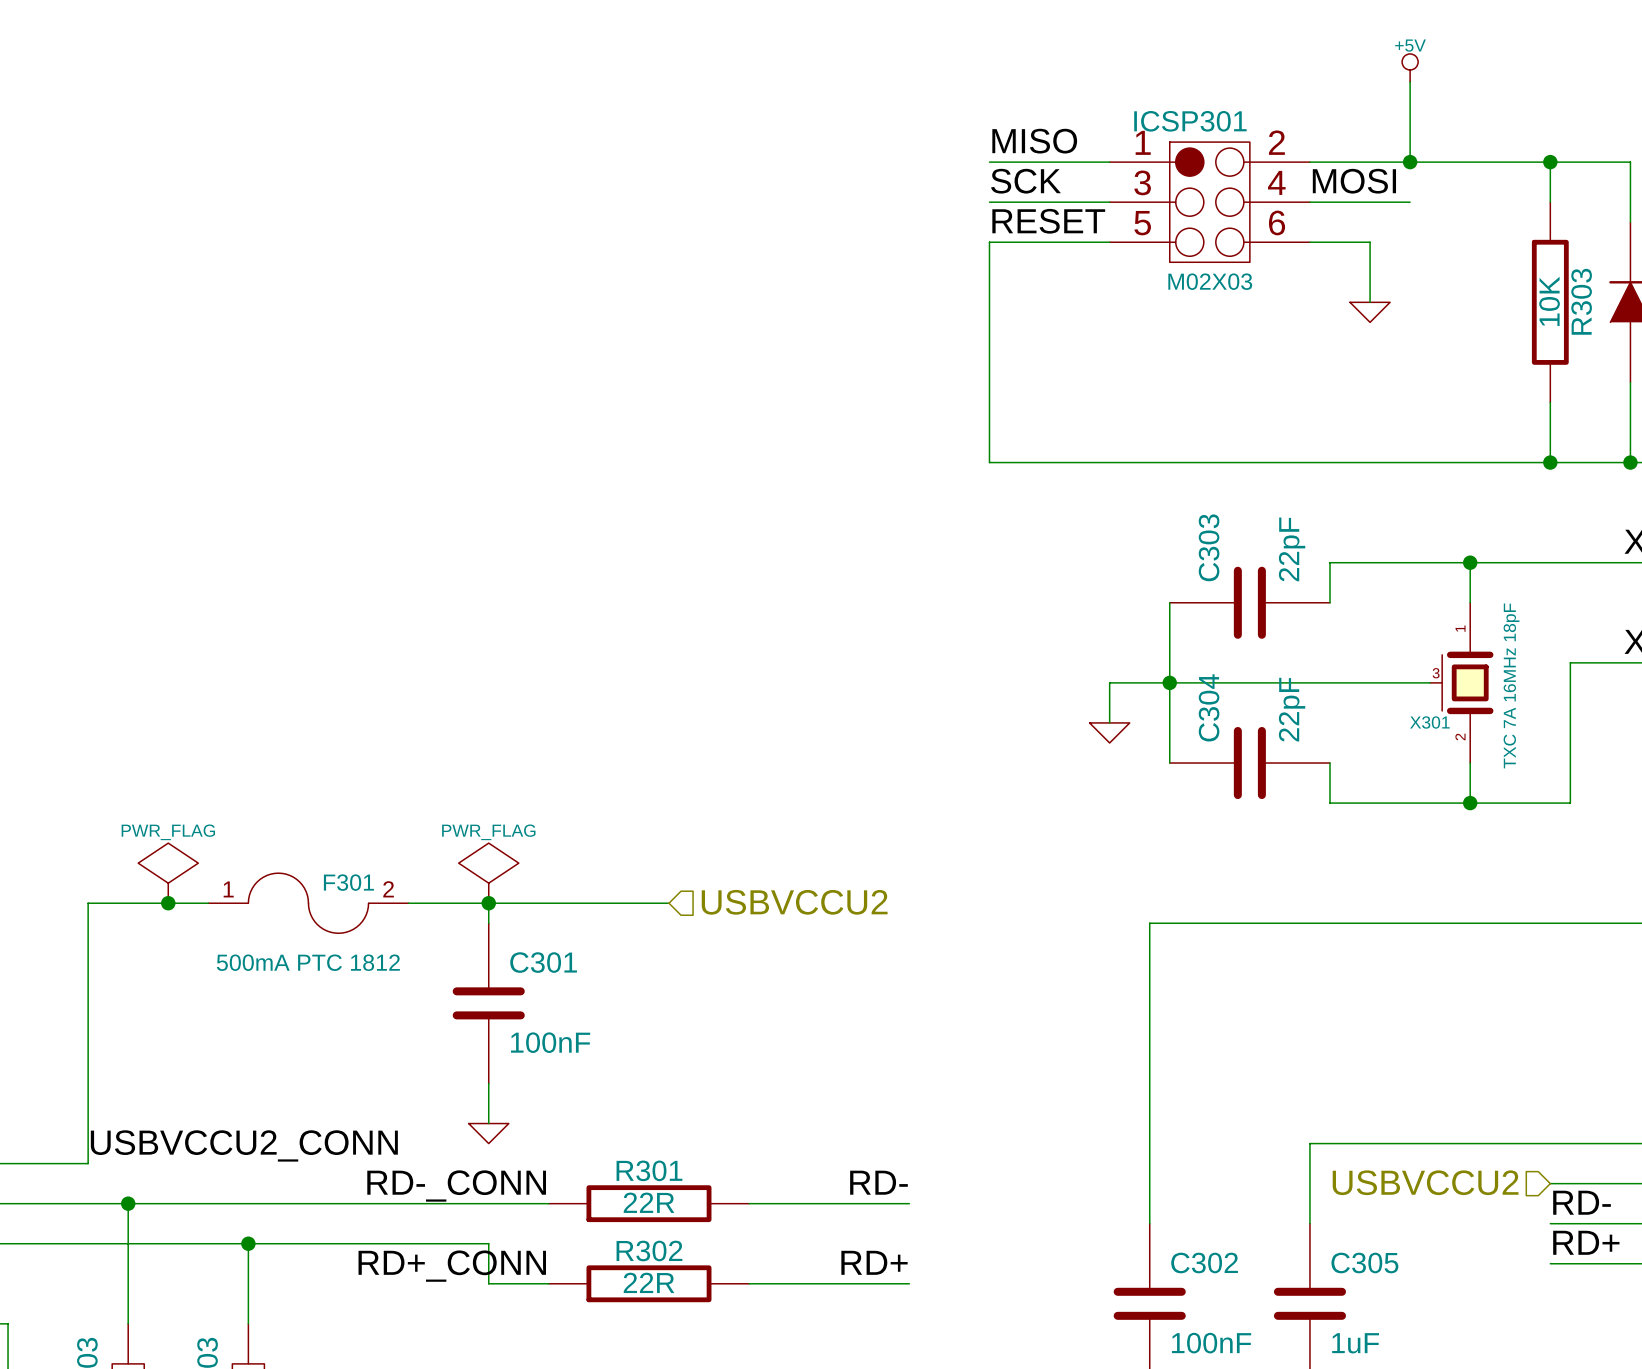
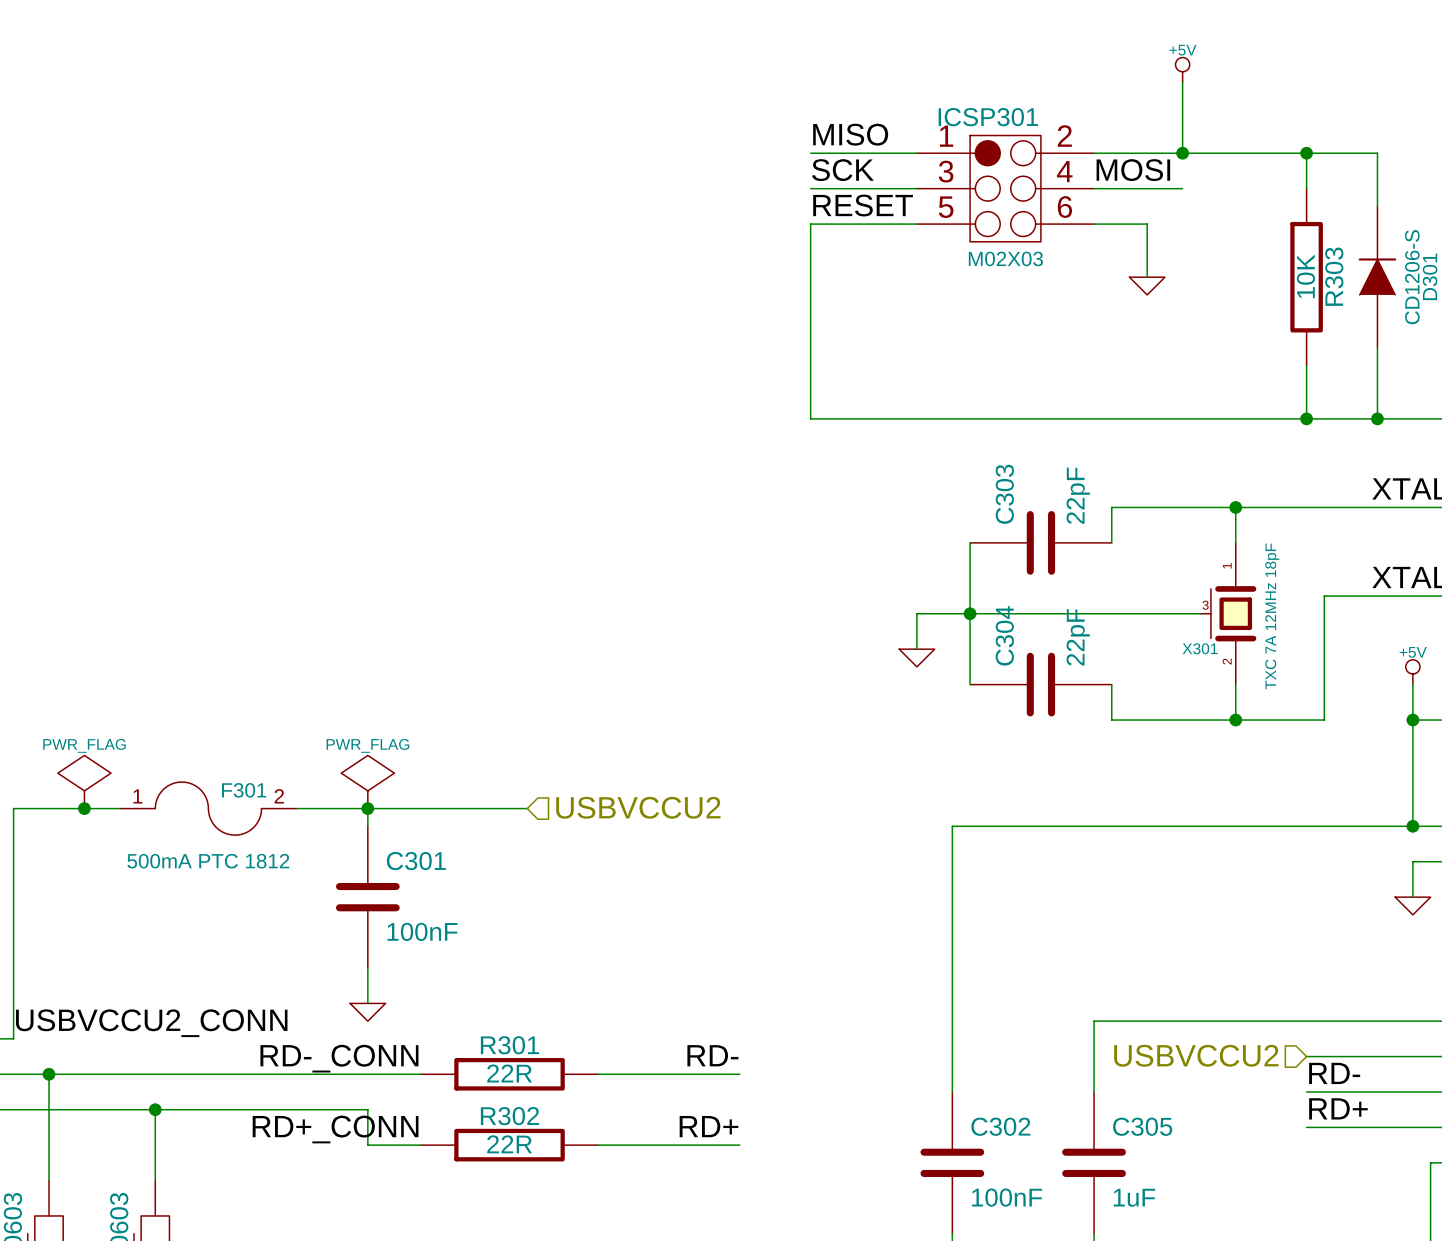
X301 value: TXC 7A 16MHz 18pF (1511, 685) -> TXC 7A 12MHz 18pF (1272, 616)

